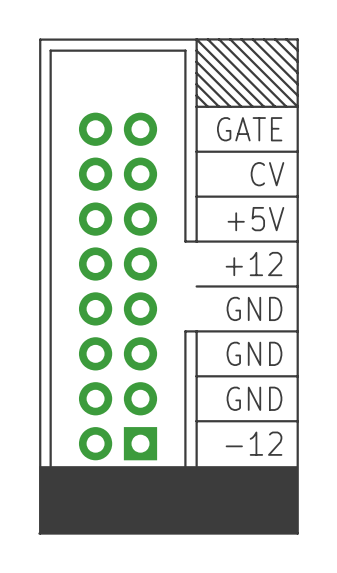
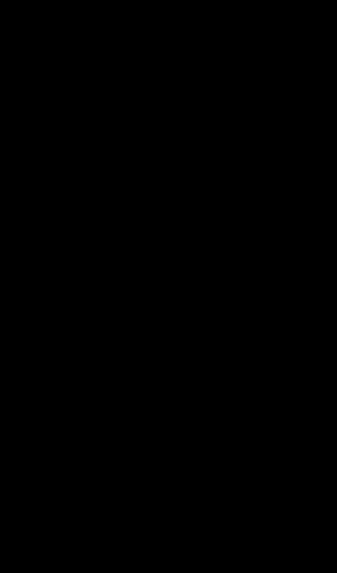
part: (168, 286) -> none

